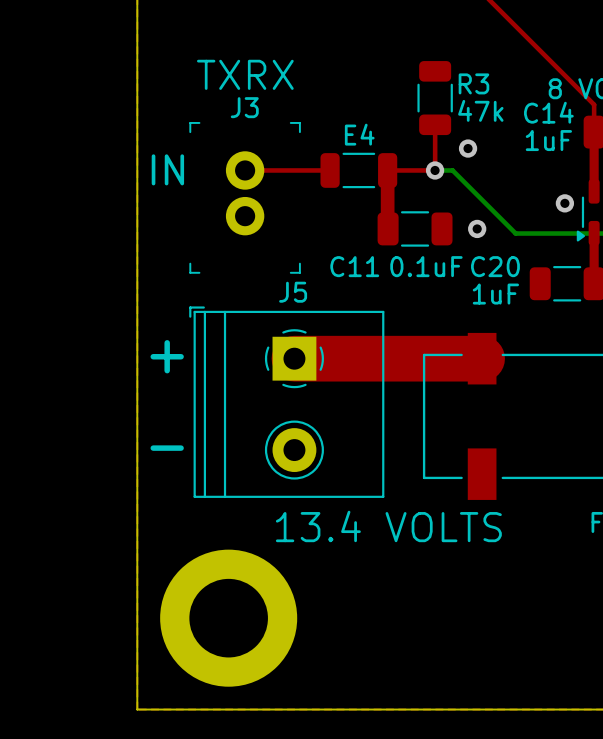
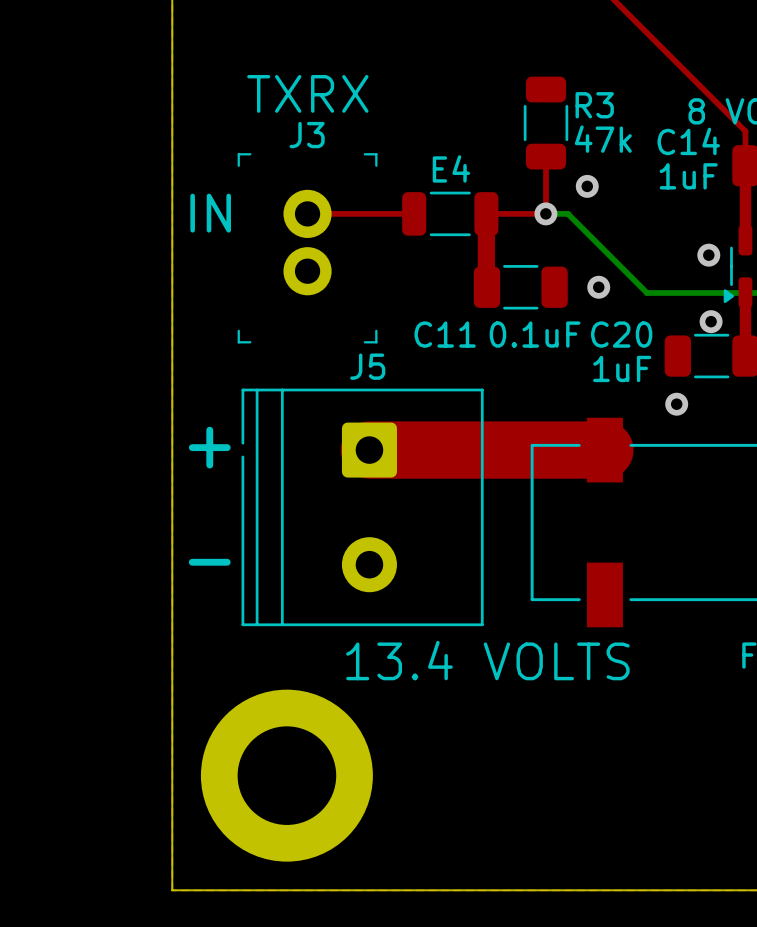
via: none -> (711, 321)
J5 footprint: [189, 306, 385, 498] -> [241, 388, 484, 627]
via: none -> (676, 404)

